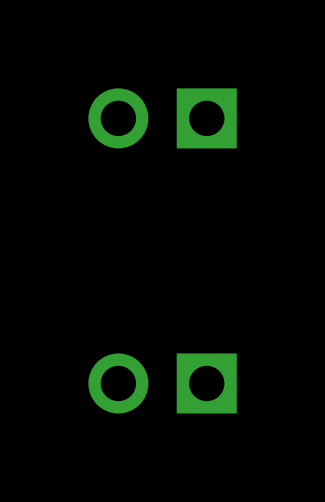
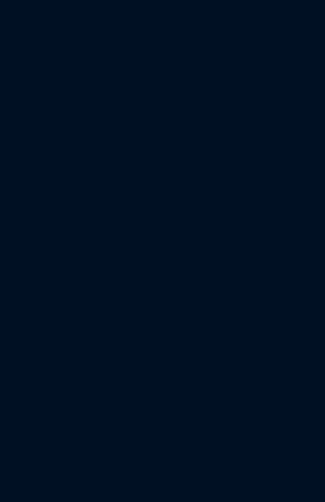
part: (162, 118) -> none
part: (162, 383) -> none

